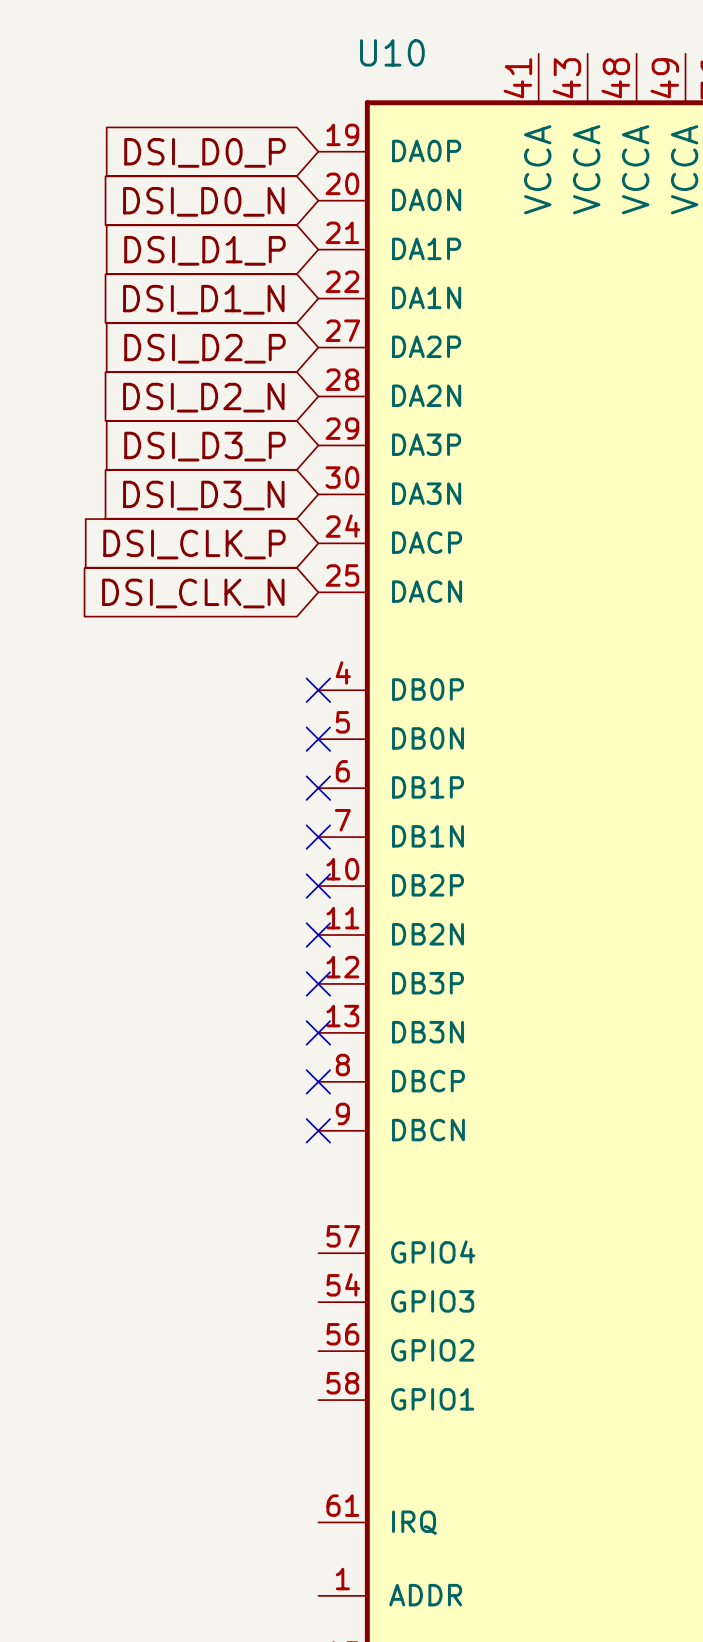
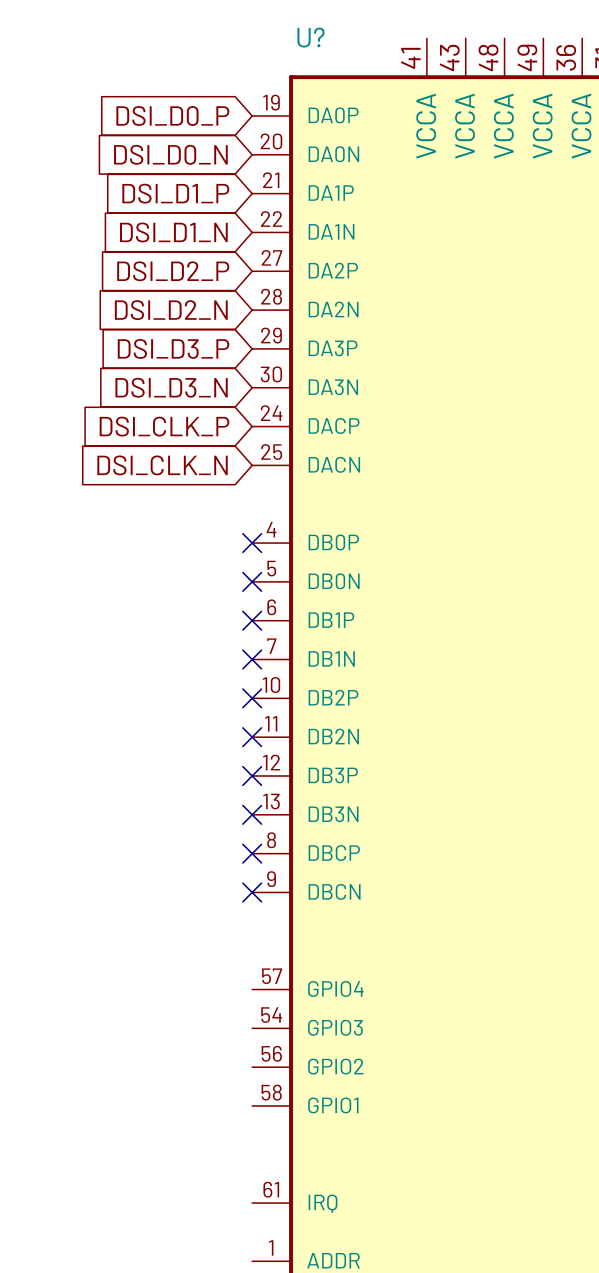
U10 name: U10 (392, 52) -> U? (311, 37)

